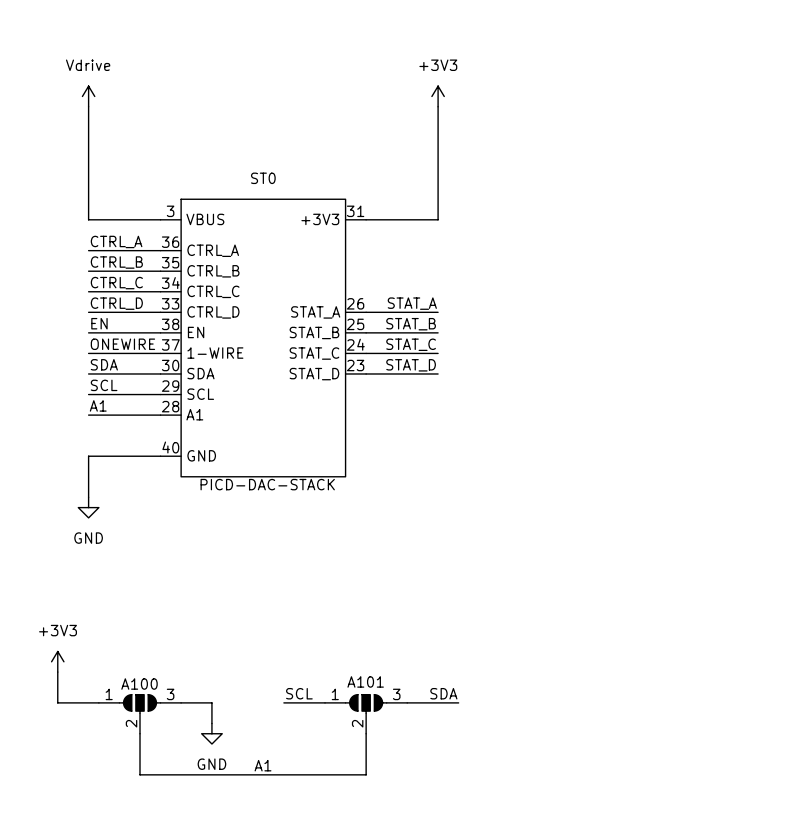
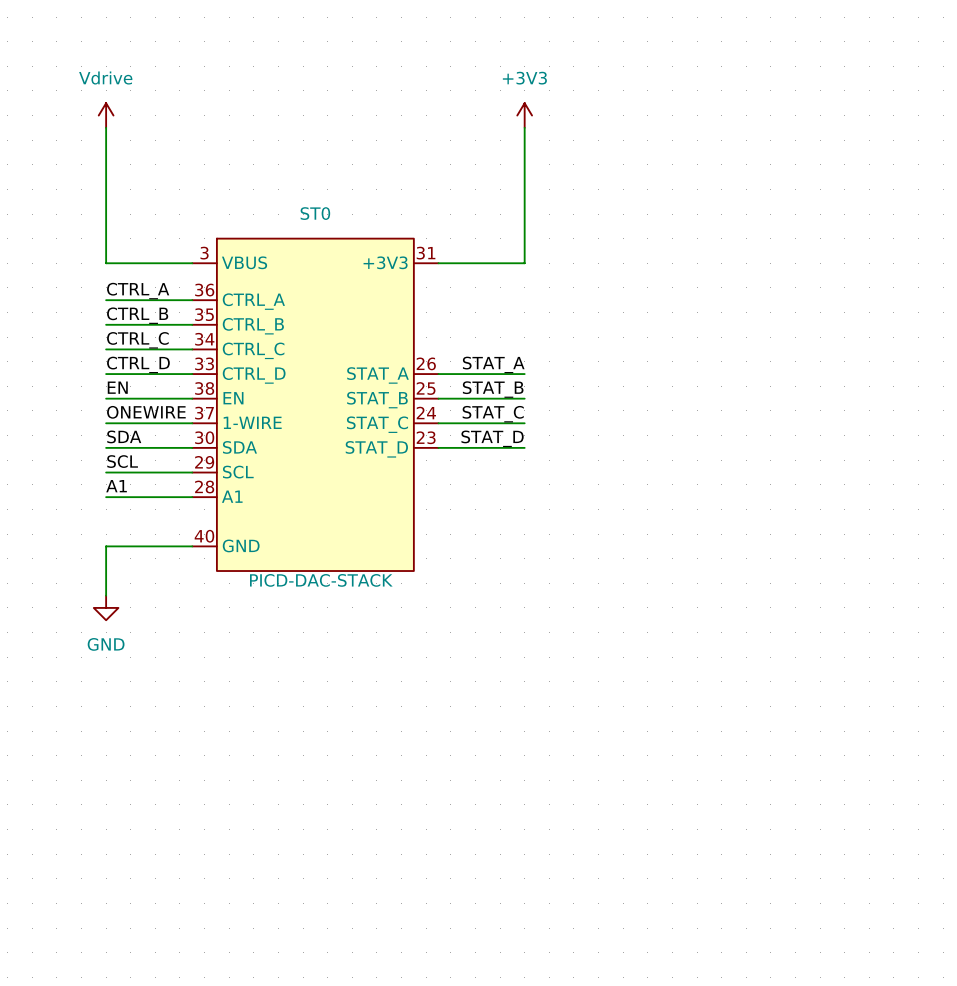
power symbol: +3V3 (57, 661) -> none
wire: (57, 672) (57, 702) (98, 702) -> none
label: SCL (299, 693) -> none
label: SDA (443, 693) -> none
wire: (181, 702) (211, 702) (211, 723) -> none
wire: (283, 702) (325, 702) -> none
wire: (407, 702) (458, 702) -> none
A100: (140, 714) -> none
A101: (366, 714) -> none
wire: (140, 733) (140, 774) (366, 774) (366, 733) -> none
power symbol: GND (211, 733) -> none
label: A1 (263, 765) -> none

